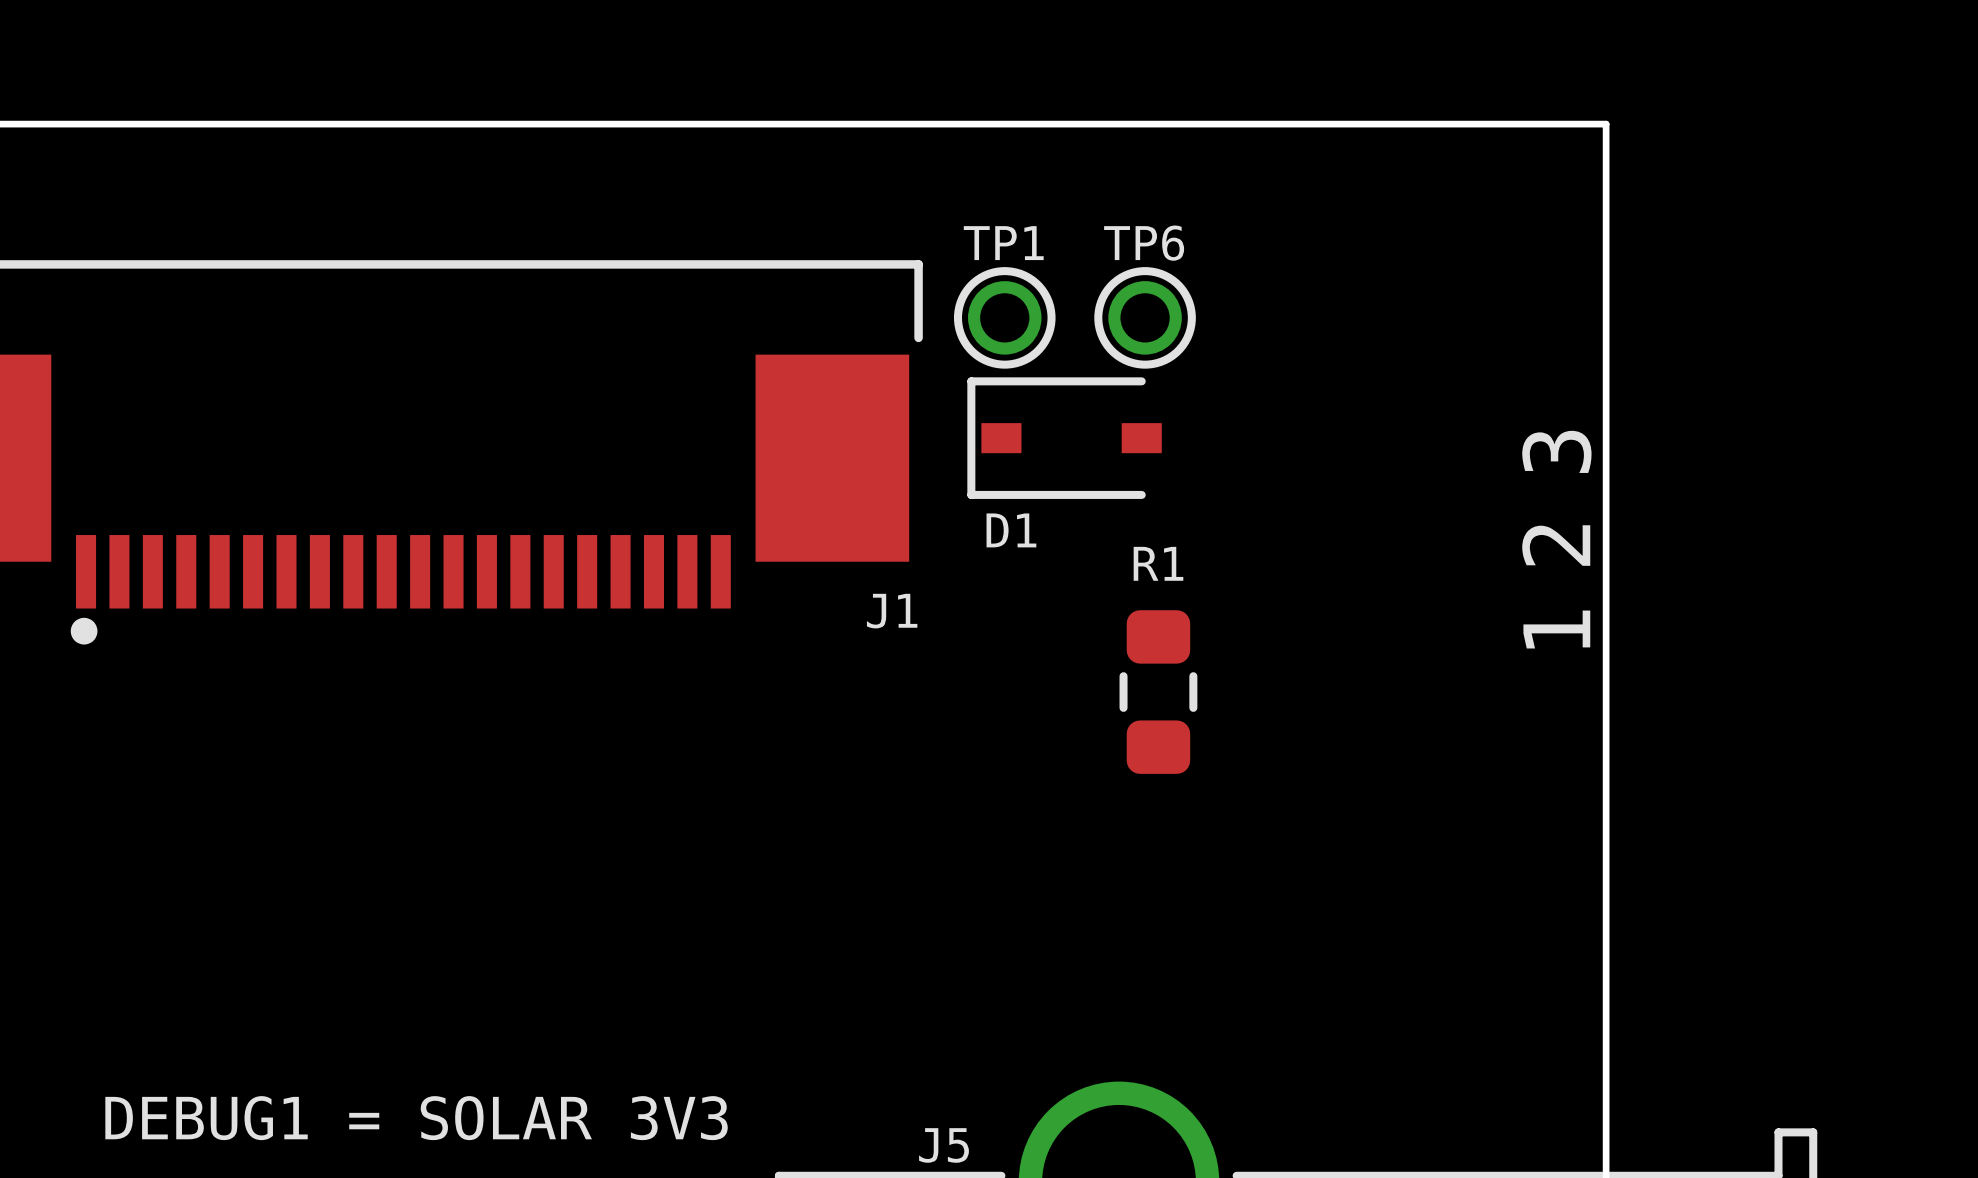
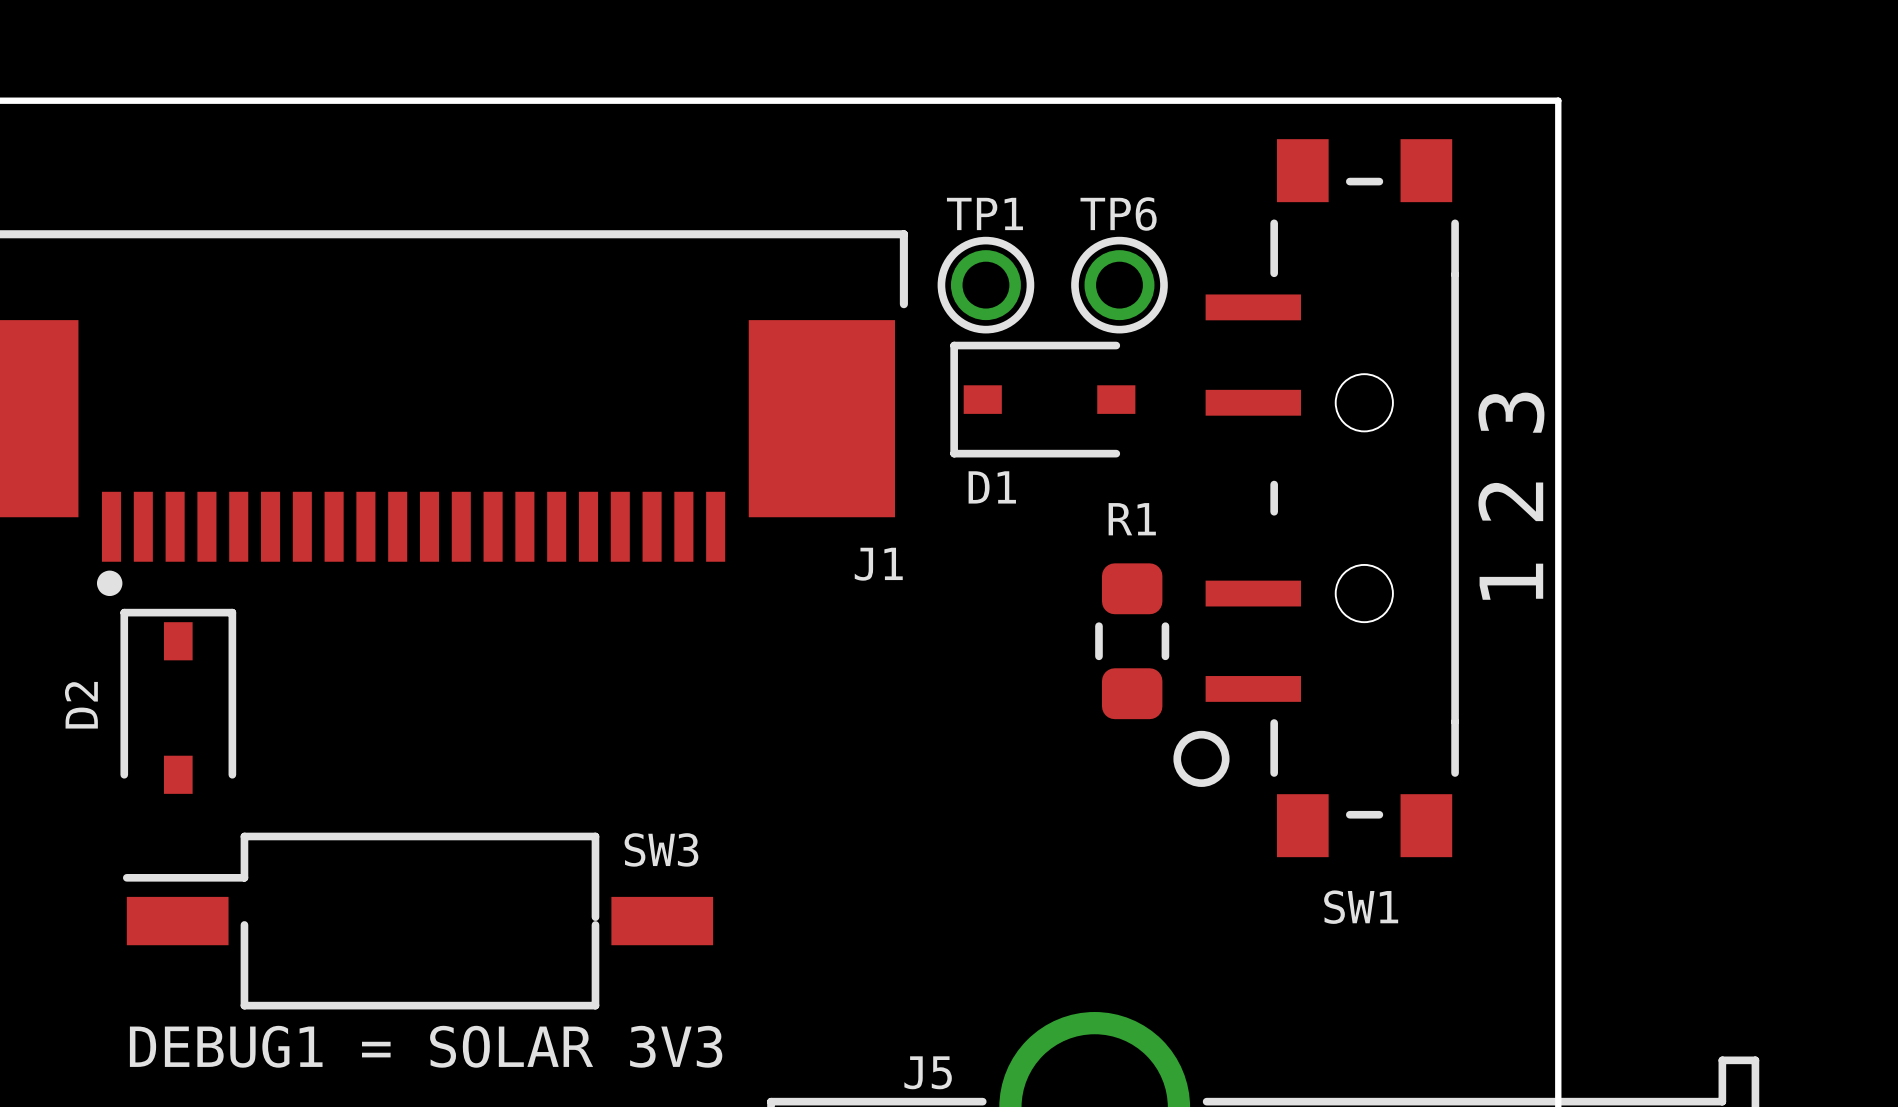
SW1: none -> (1316, 498)
D2: none -> (178, 701)
SW3: none -> (418, 921)

